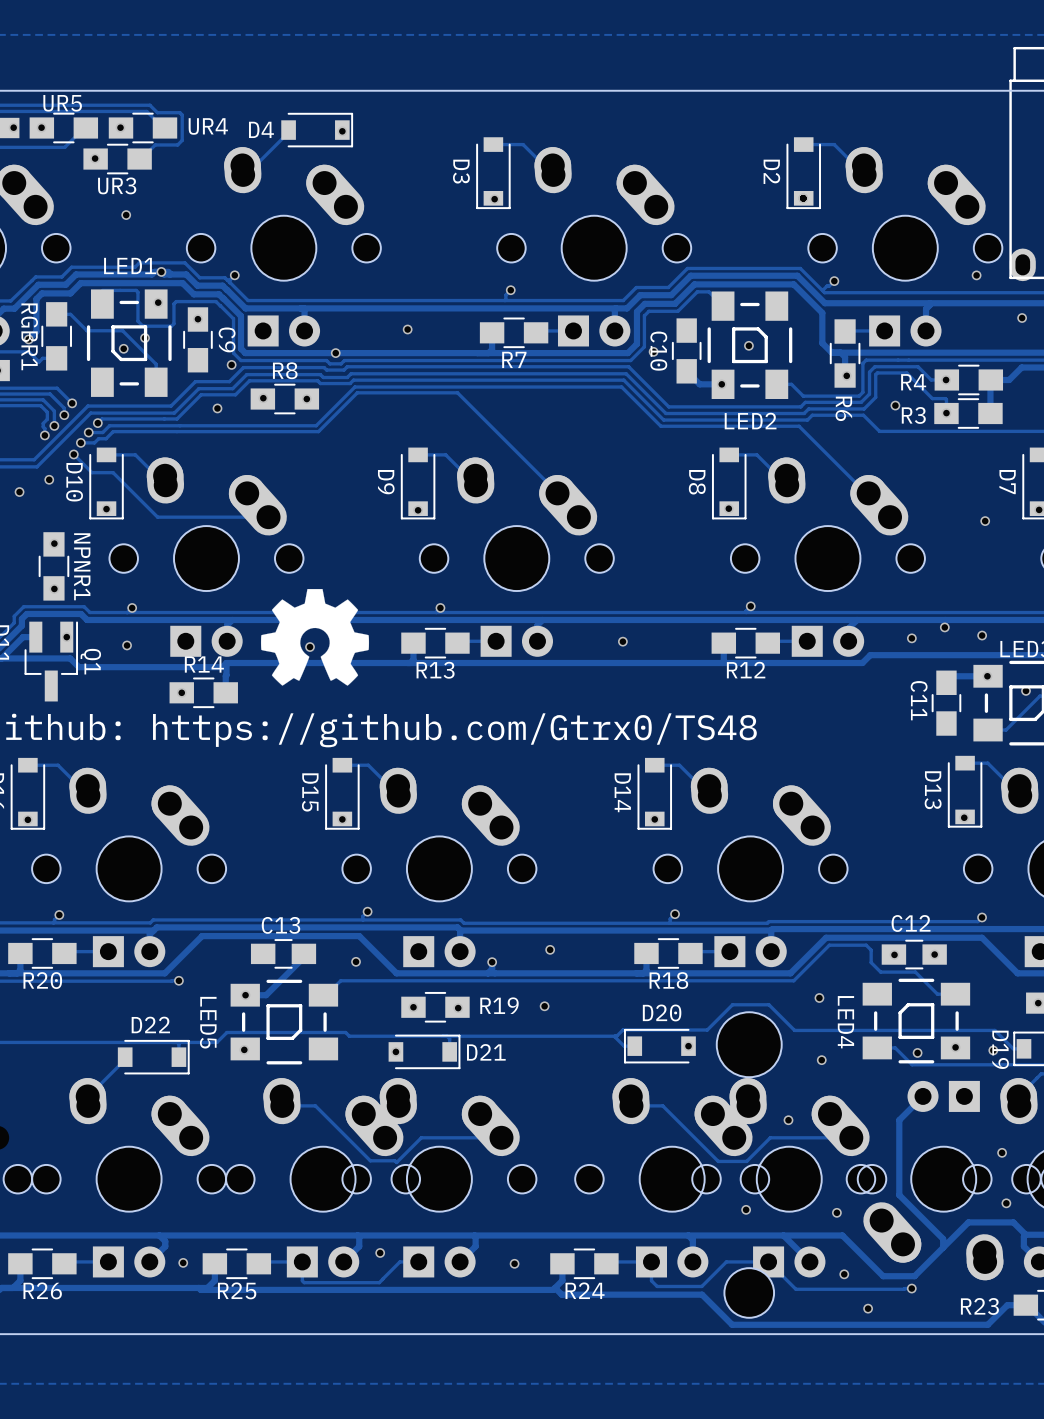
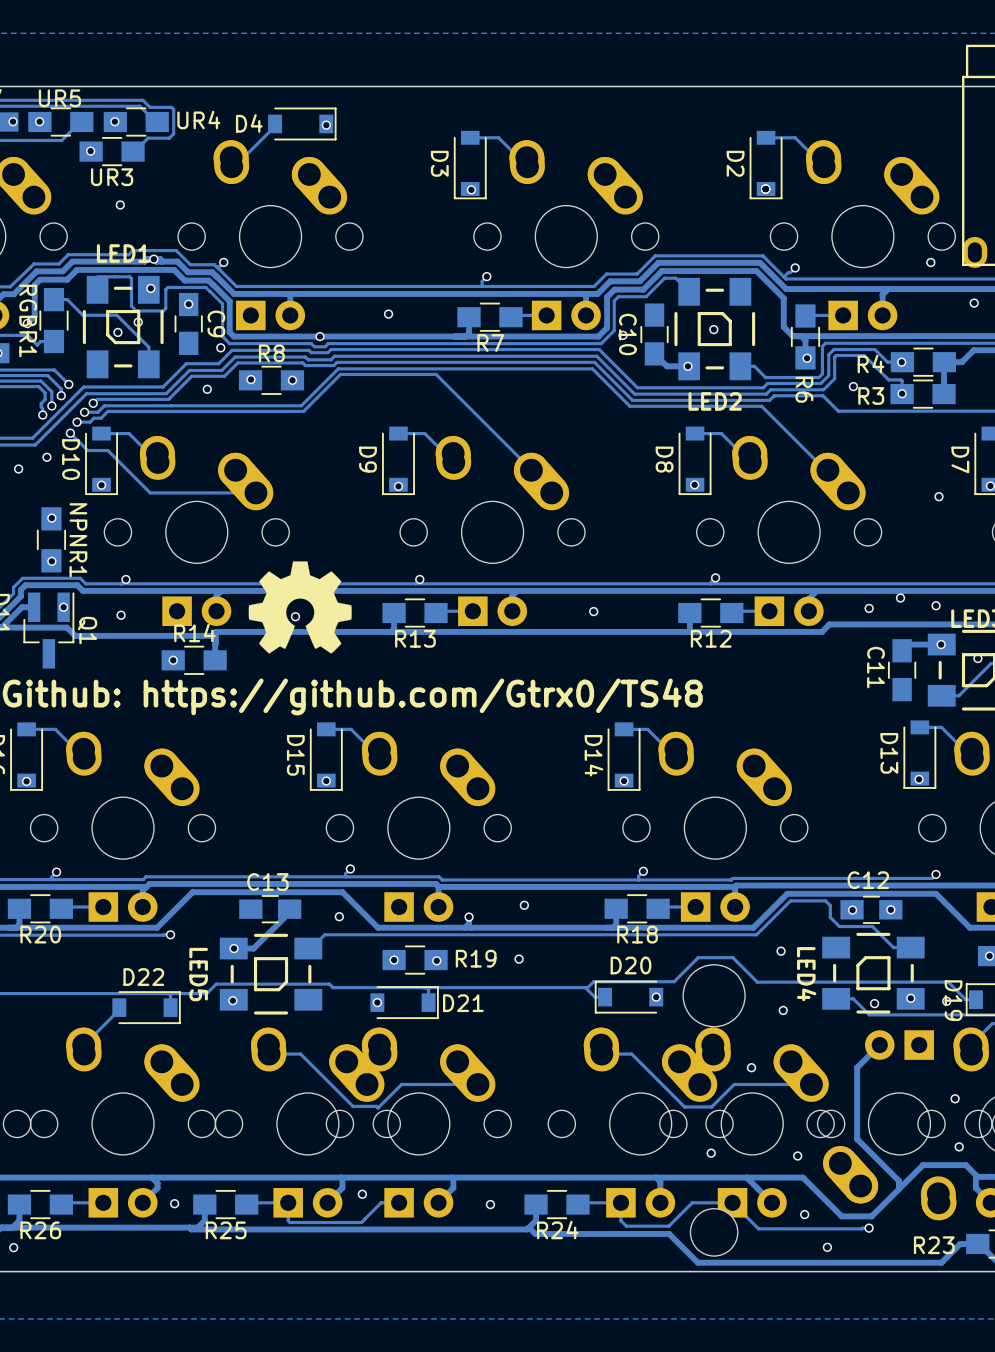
via: none -> (13, 1247)

